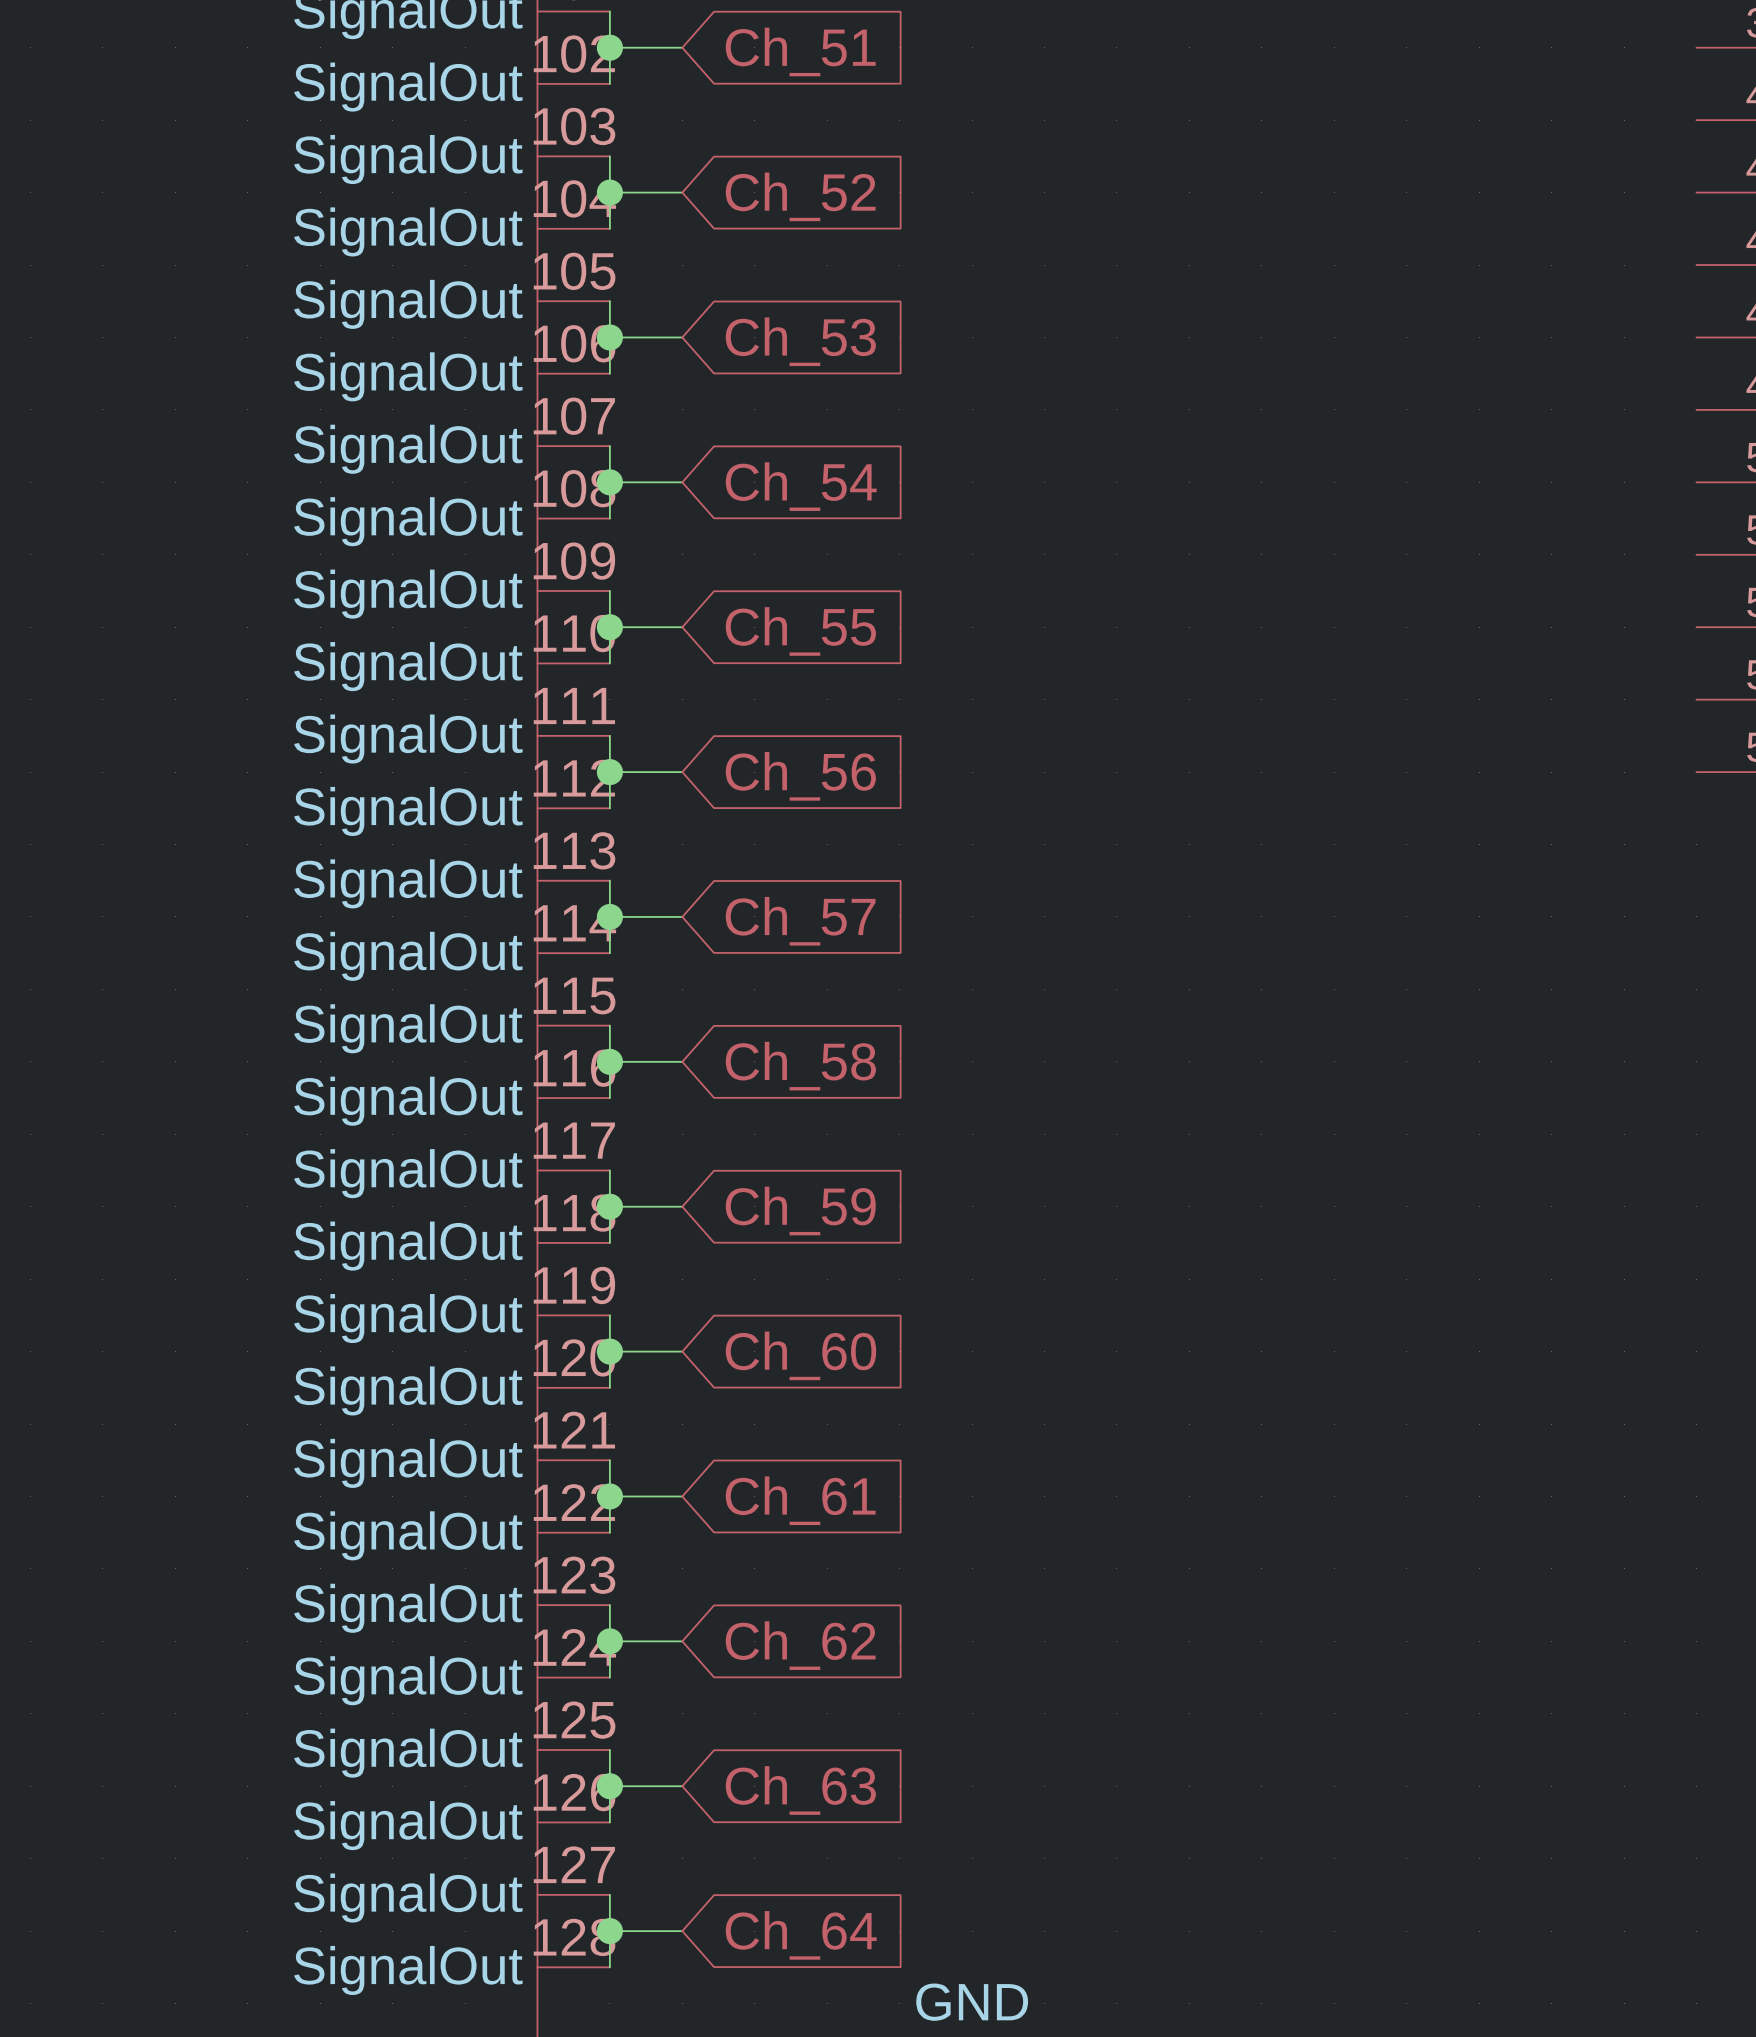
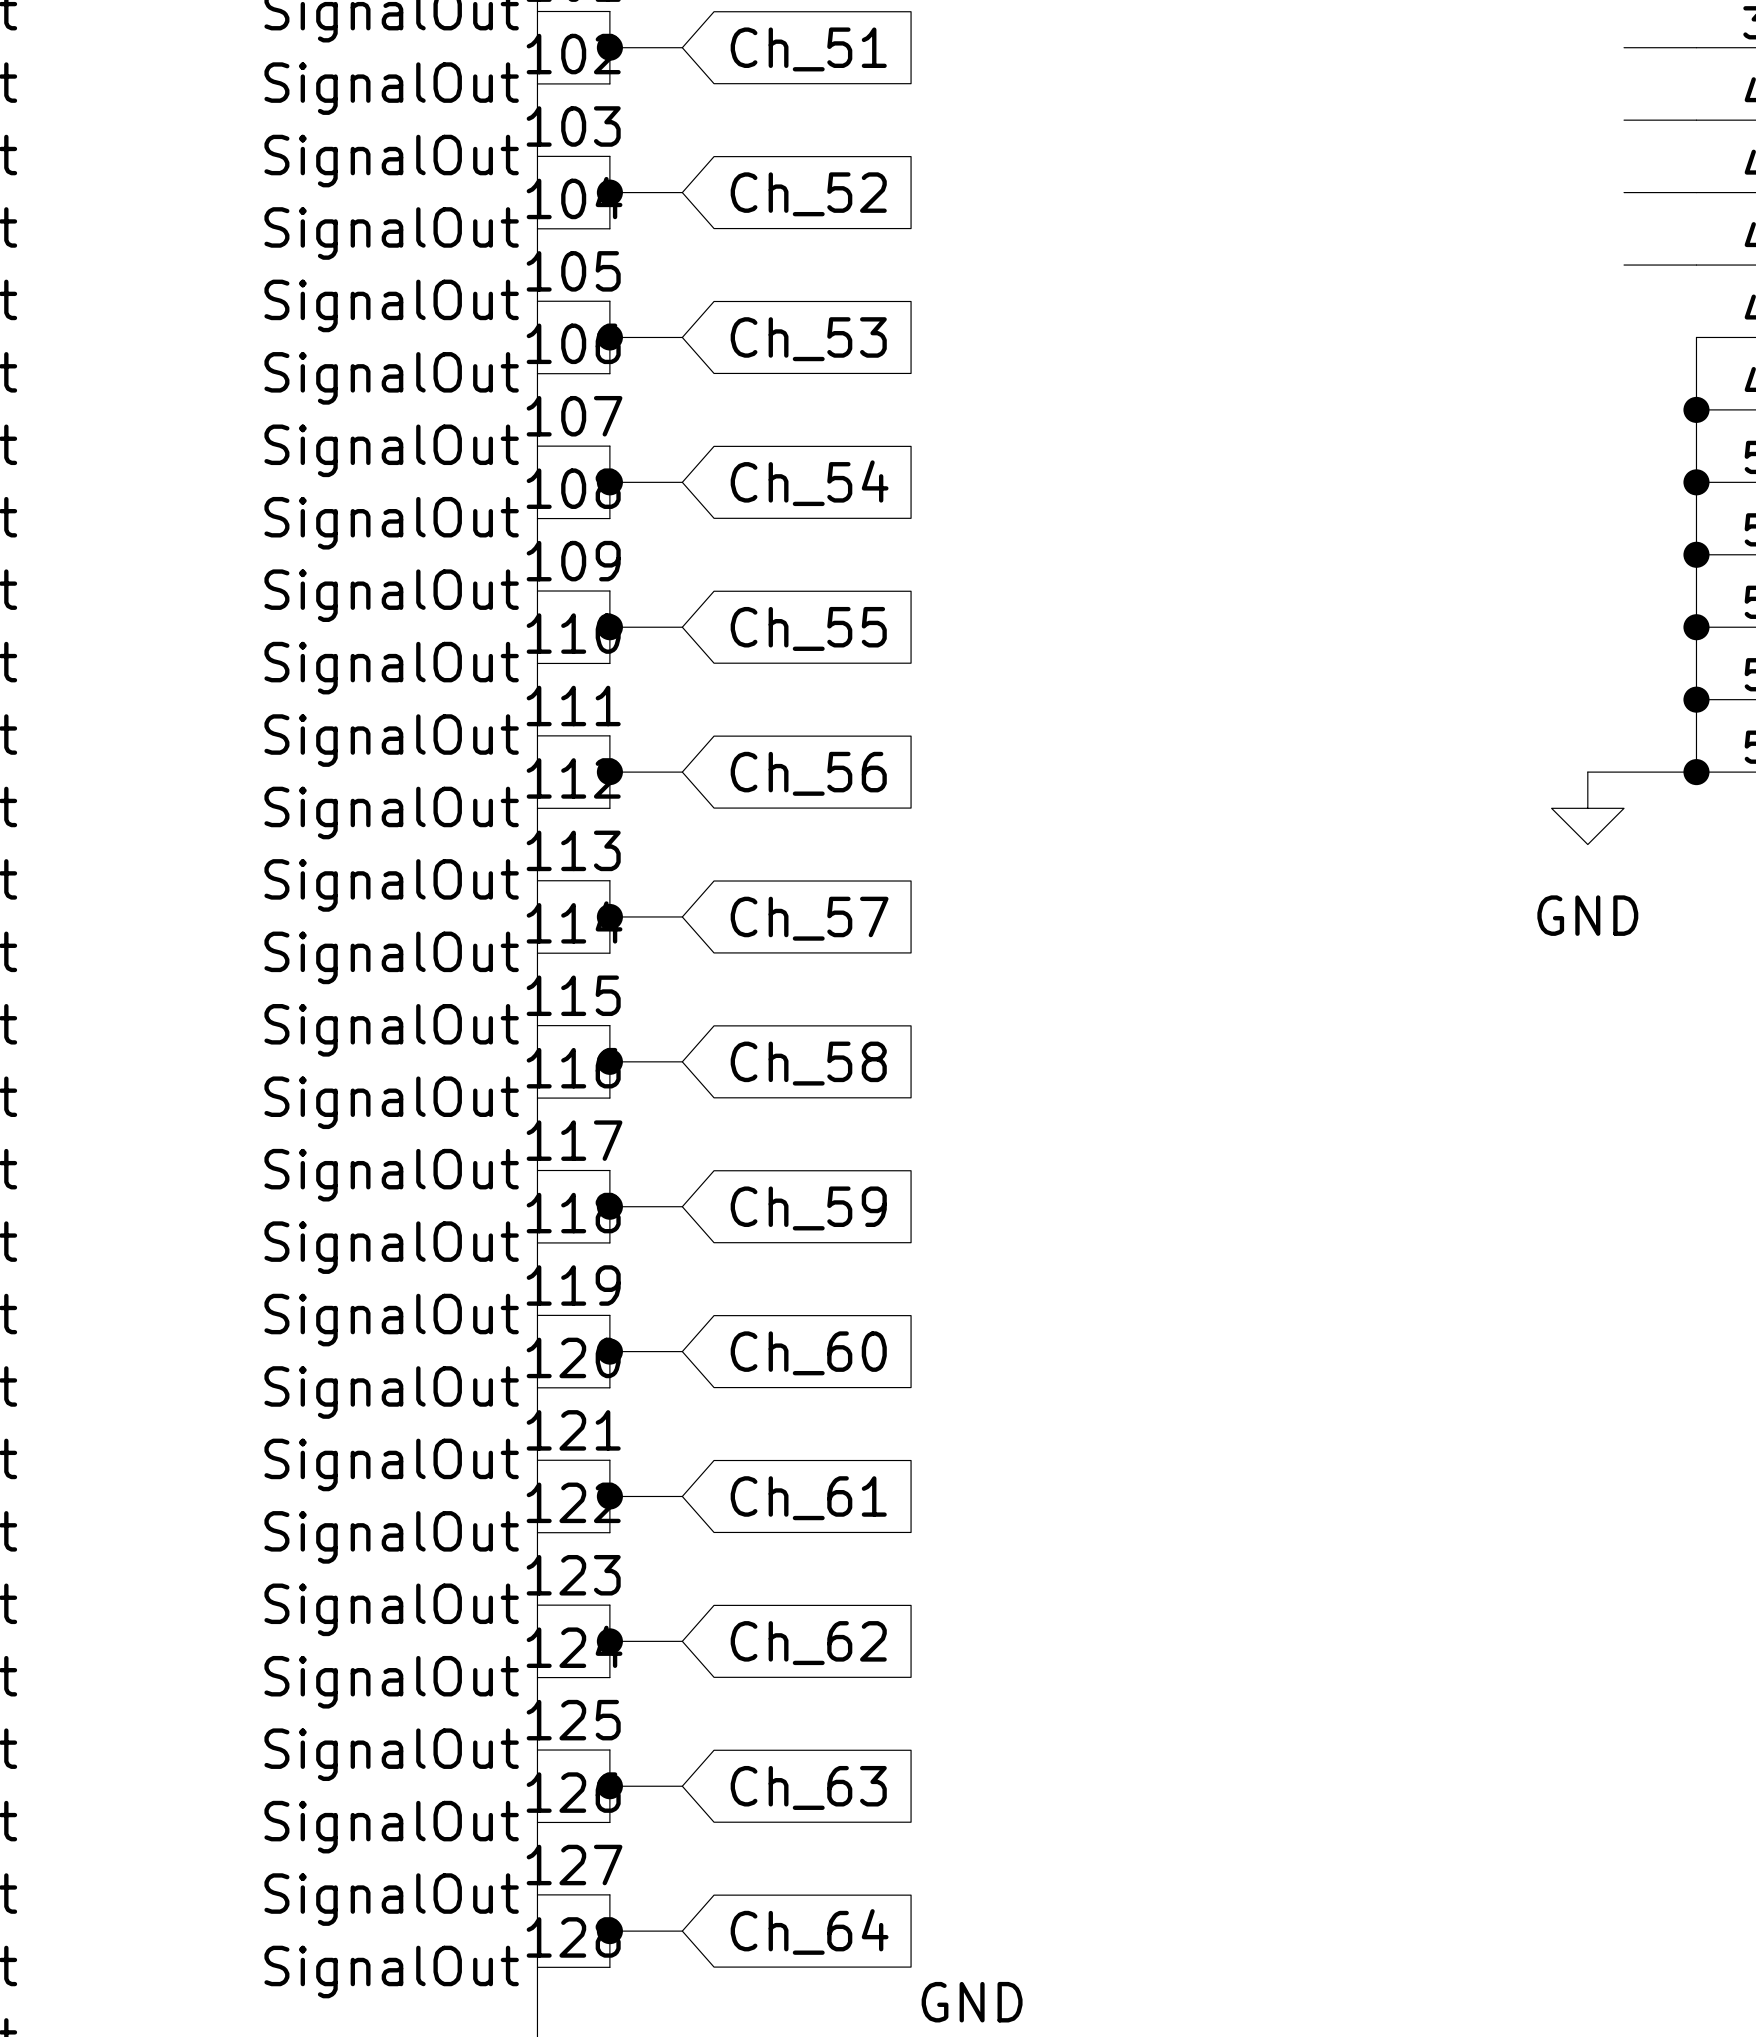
wire: none -> (1624, 47) (1696, 47)
wire: none -> (1624, 120) (1696, 120)
wire: none -> (1624, 192) (1696, 192)
wire: none -> (1624, 265) (1696, 265)
wire: none -> (1696, 337) (1696, 772) (1587, 772)
junction: none -> (1696, 409)
junction: none -> (1696, 482)
junction: none -> (1696, 554)
junction: none -> (1696, 627)
junction: none -> (1696, 699)
junction: none -> (1696, 772)
power symbol: none -> GND (1587, 808)

